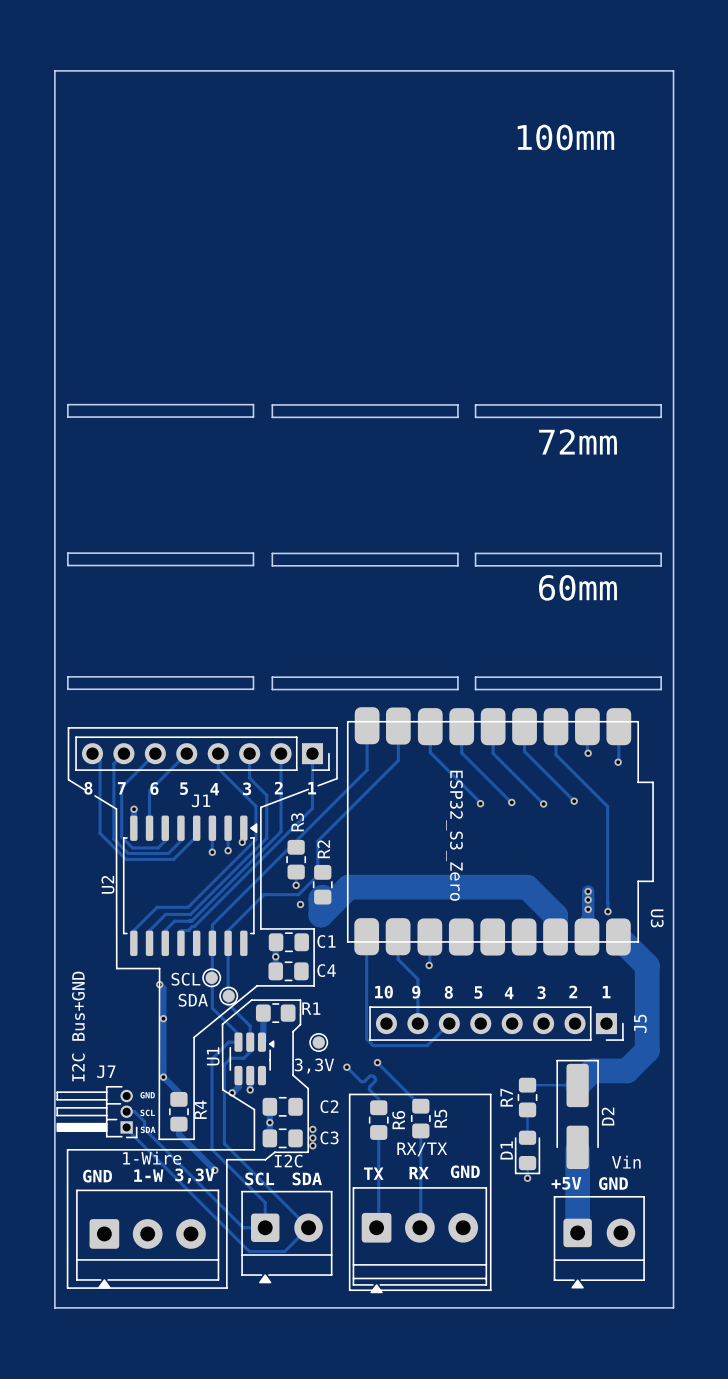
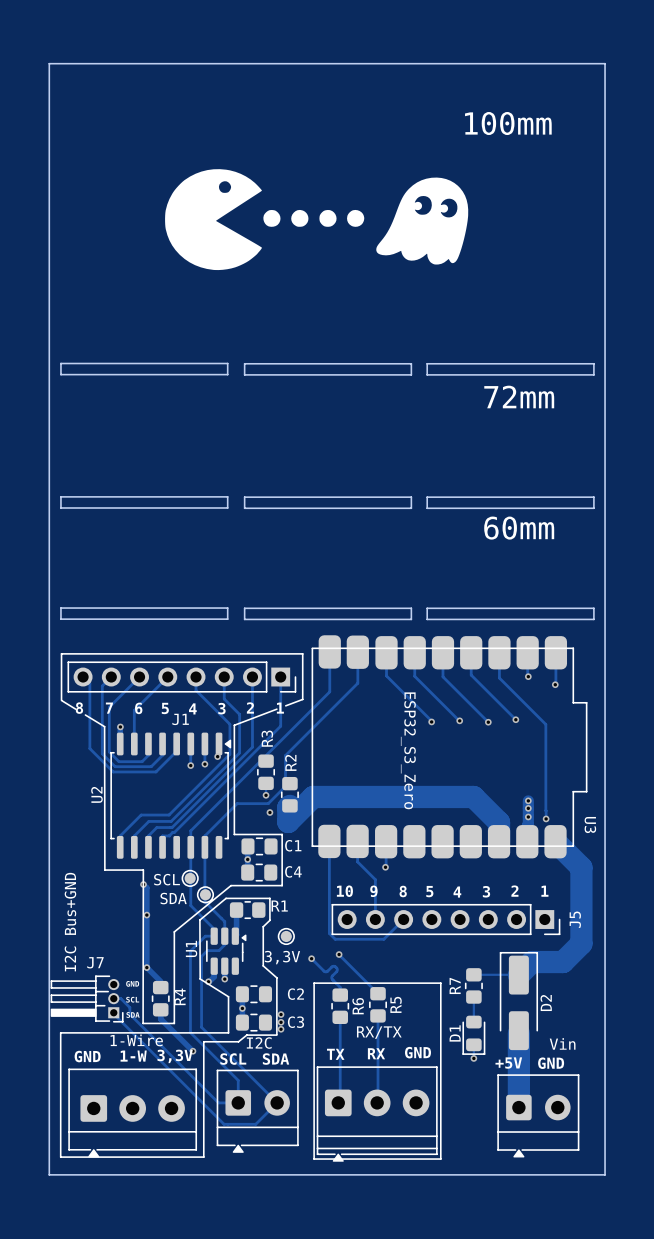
drawing: none -> [165, 169, 469, 271]

